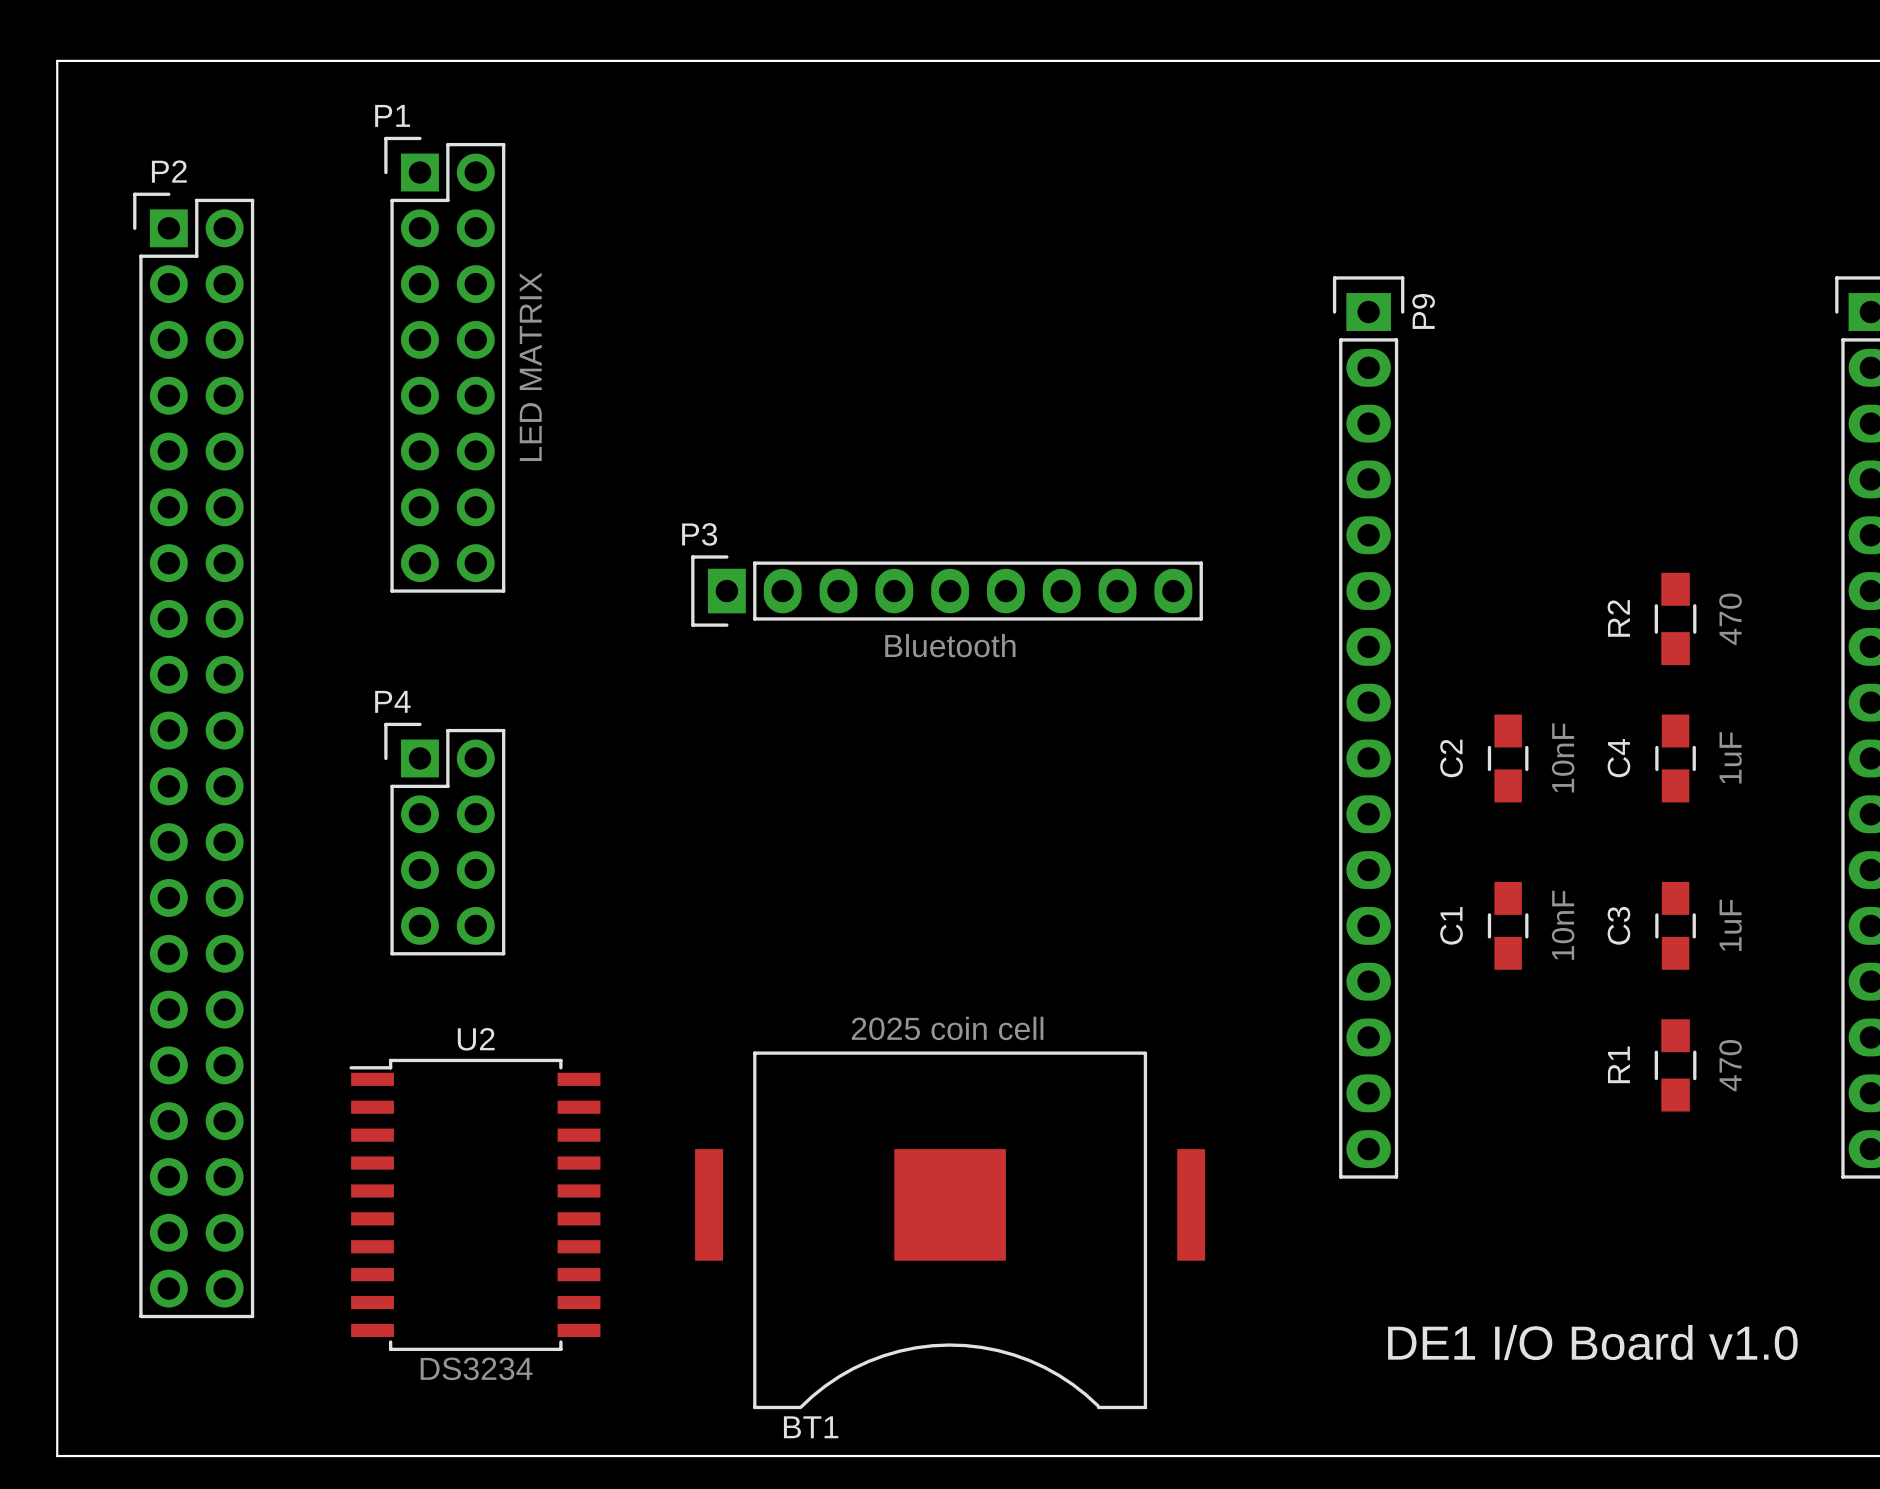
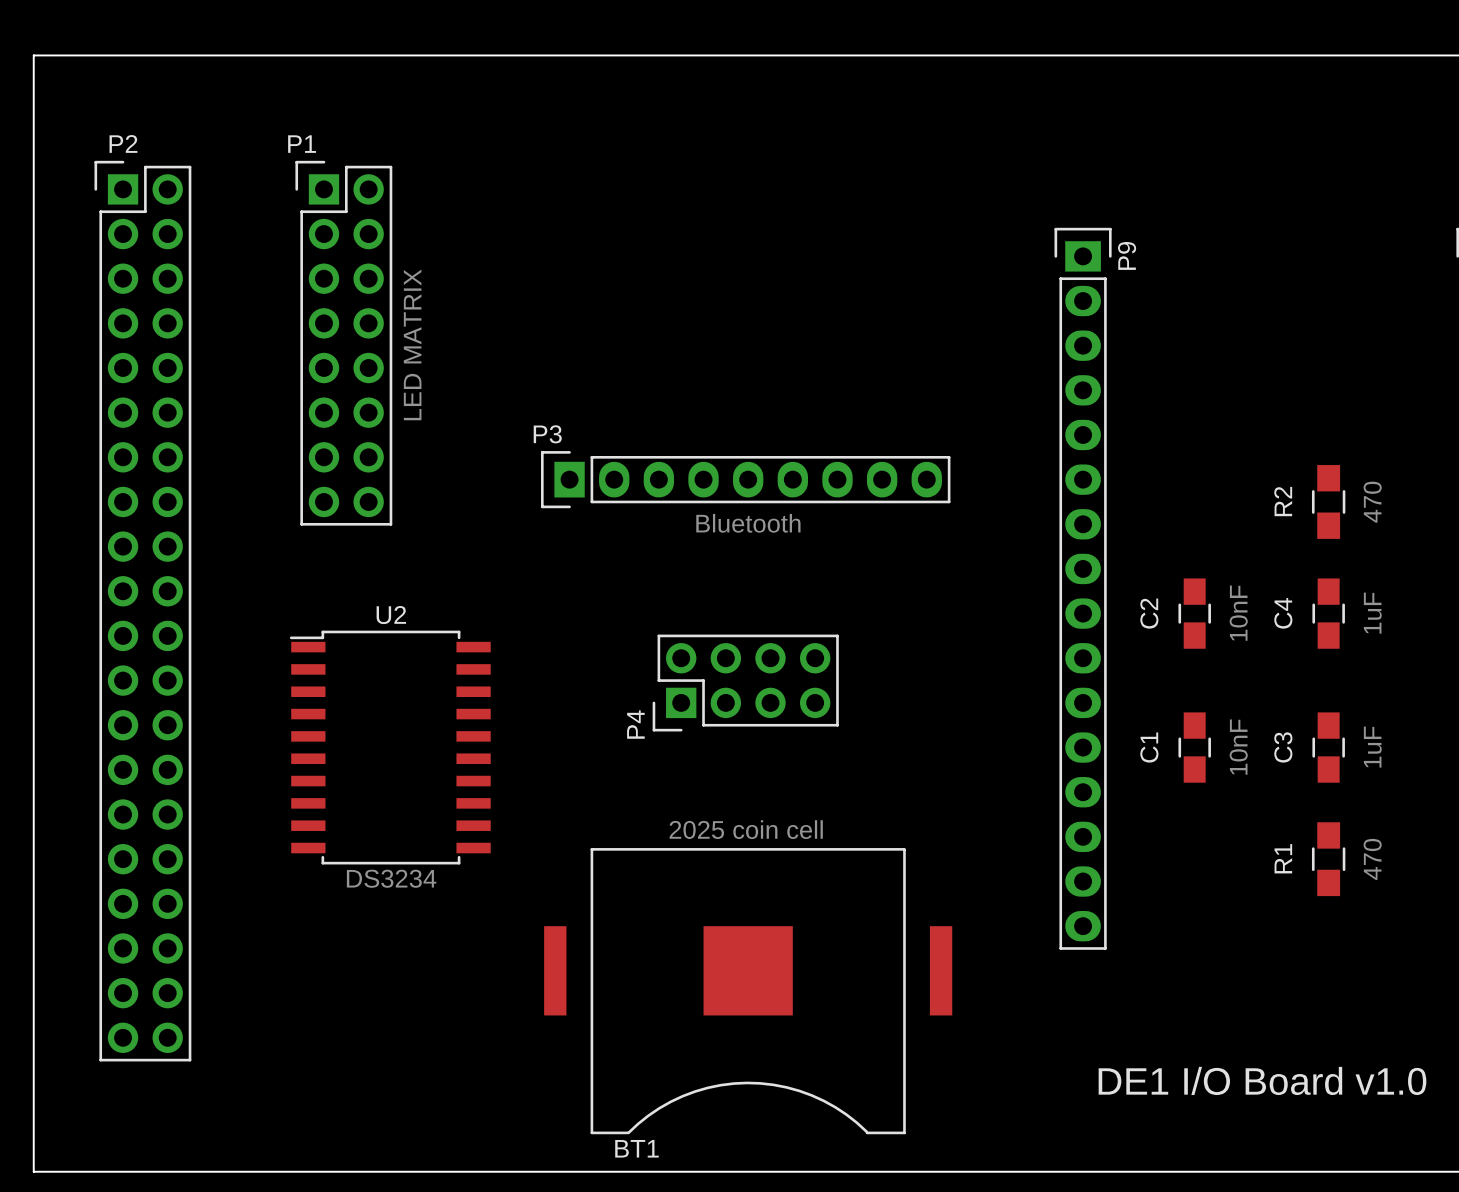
P1 position: (444, 364) -> (343, 343)
P4 rotation: 0° (444, 839) -> 90° counterclockwise (745, 683)
P4 position: (444, 839) -> (745, 683)
U2 position: (474, 1204) -> (390, 747)

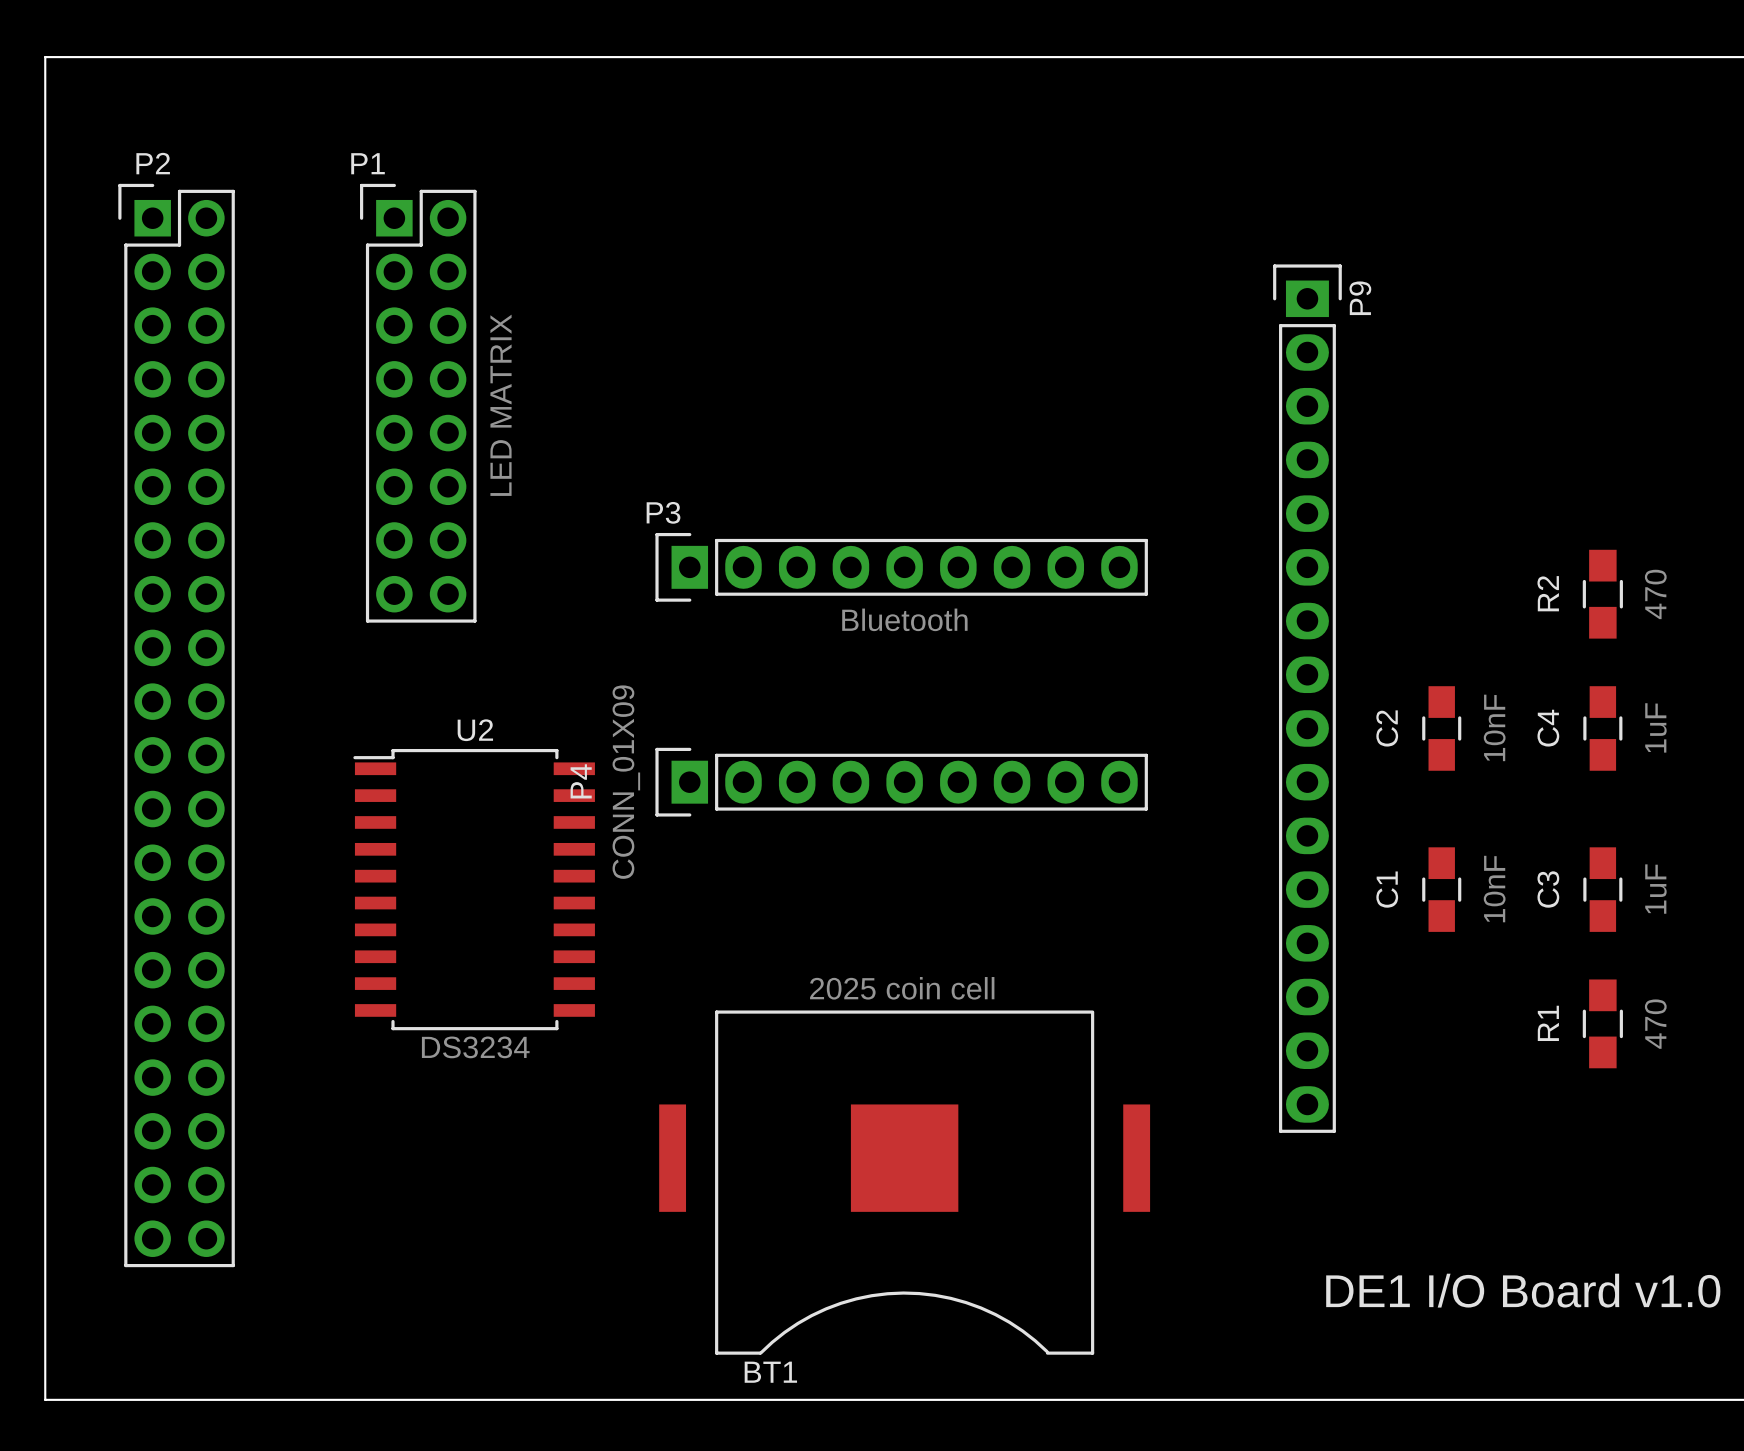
P4 footprint: [652, 634, 839, 732] -> [655, 747, 1148, 817]
P4 value: none -> CONN_01X09 (626, 782)
P4 name position: P4 (635, 724) -> P4 (581, 781)

